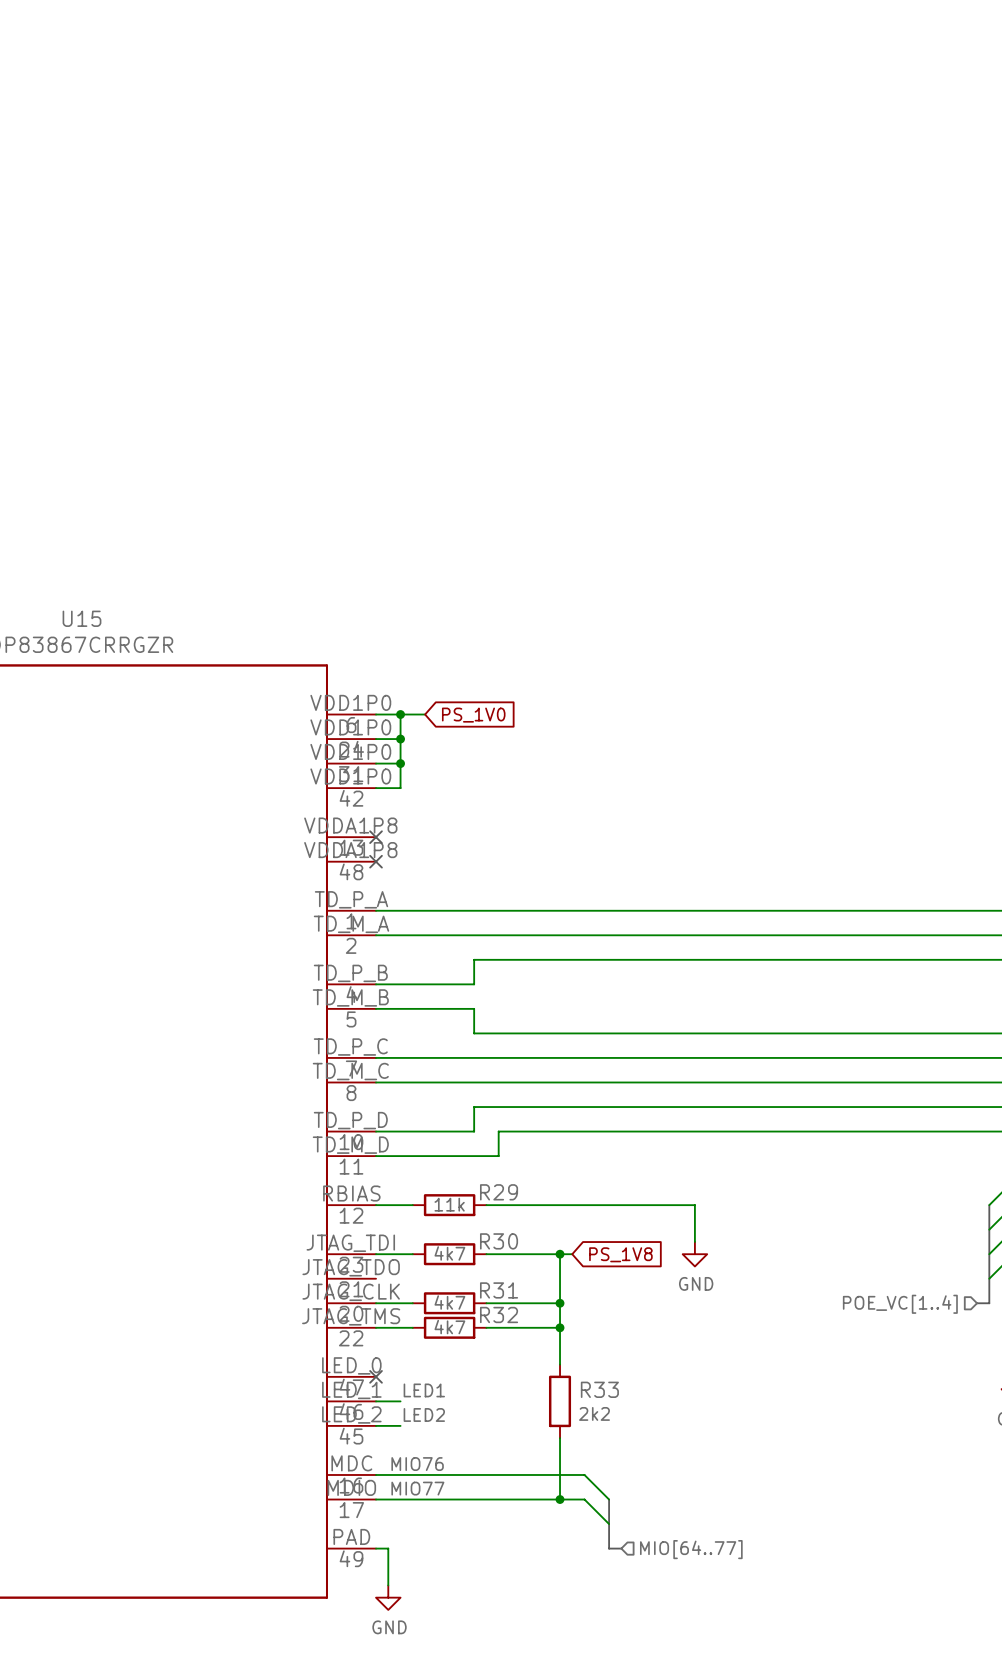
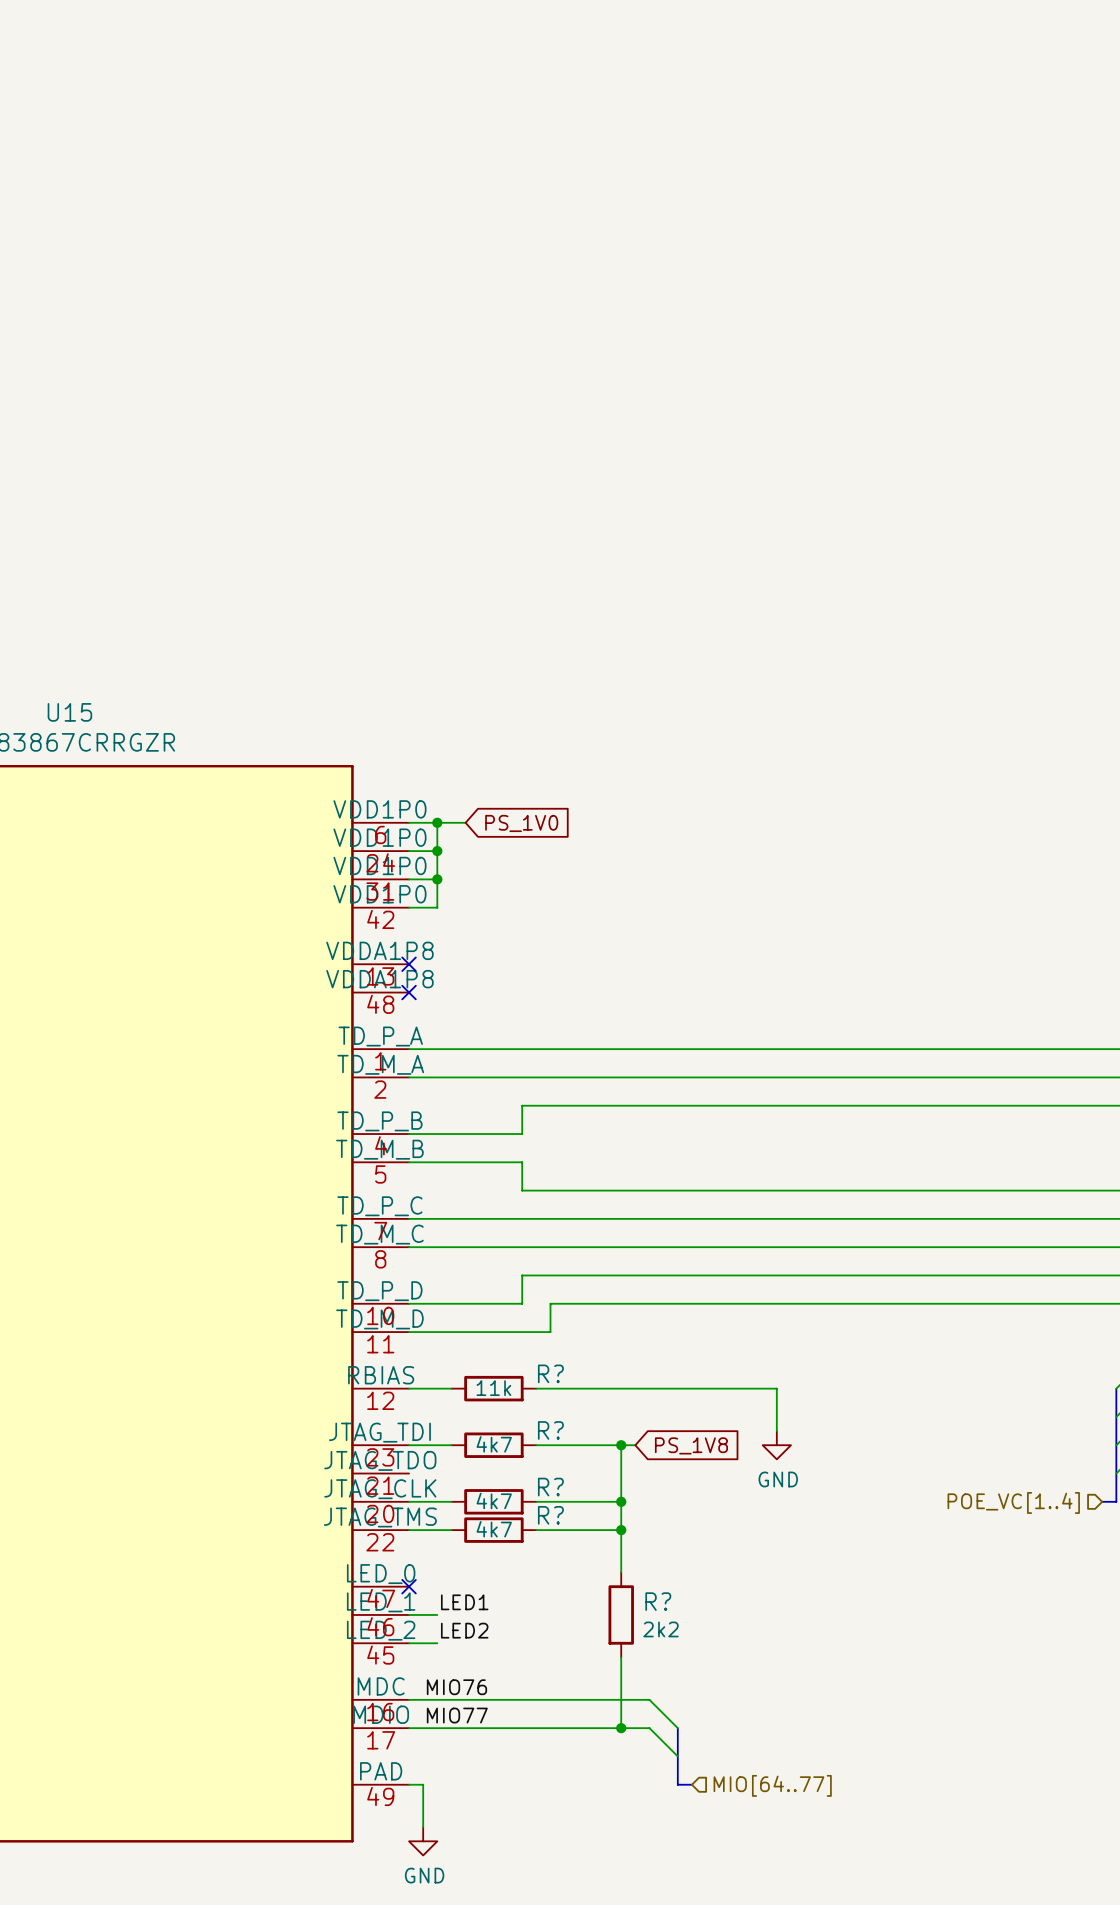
R29 name: R29 (499, 1192) -> R? (550, 1373)
R30 name: R30 (499, 1241) -> R? (550, 1430)
R31 name: R31 (499, 1290) -> R? (550, 1487)
R32 name: R32 (499, 1314) -> R? (550, 1515)
R33 name: R33 (599, 1389) -> R? (658, 1601)

